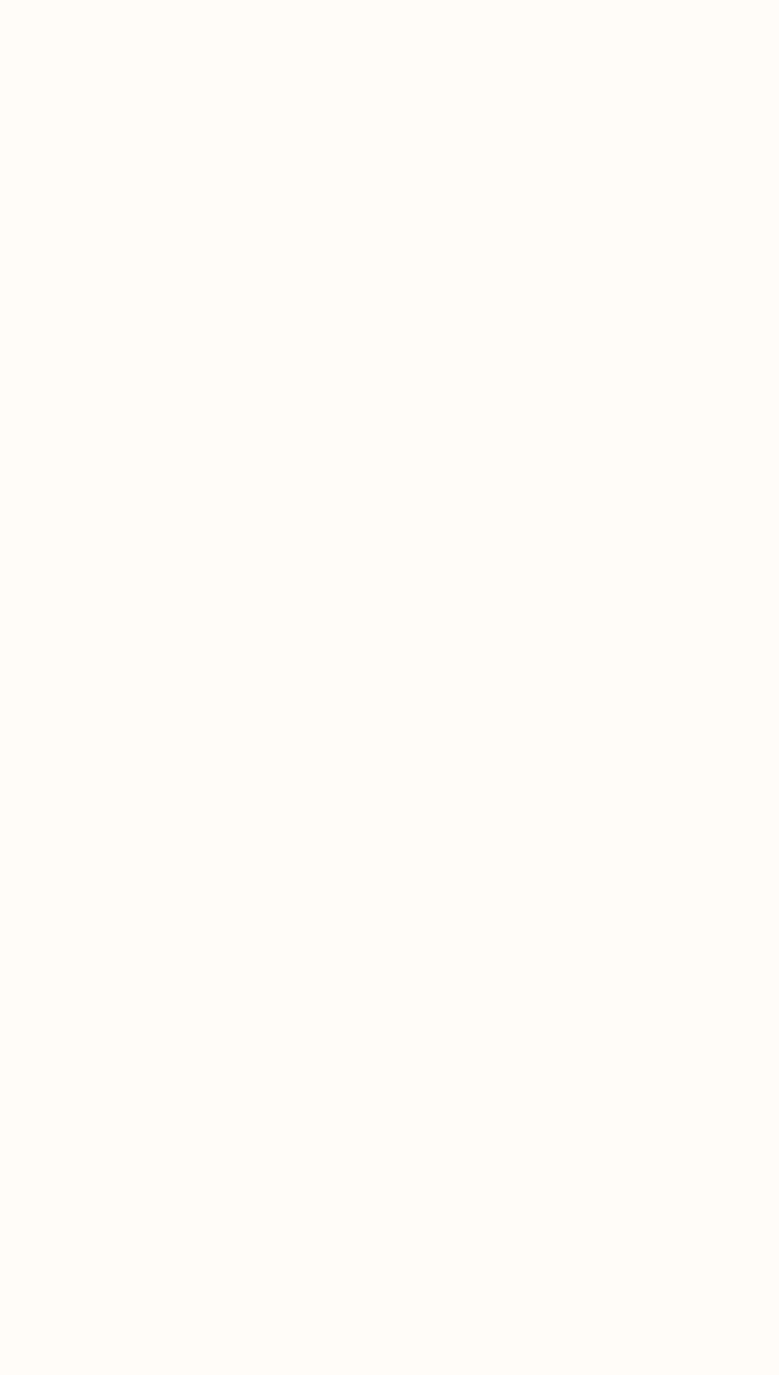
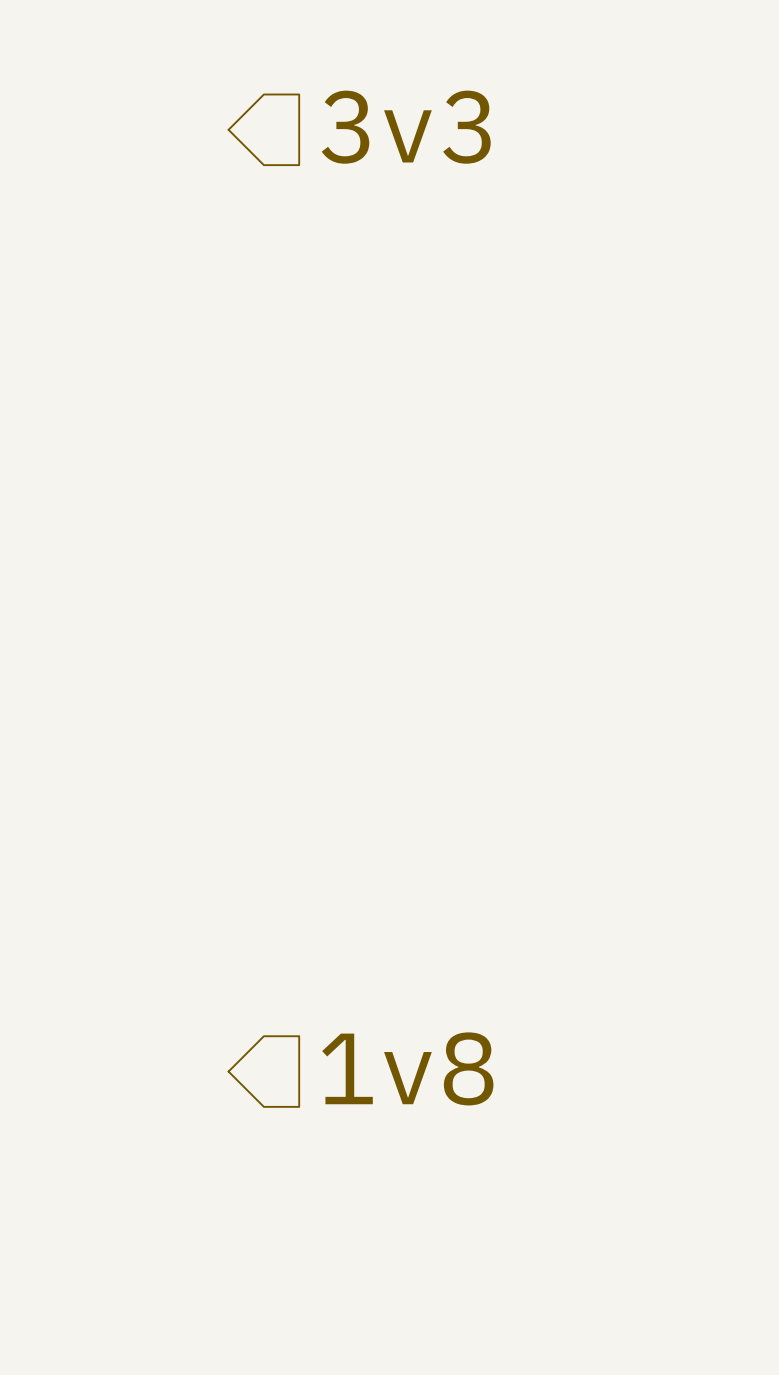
hierarchical label: none -> 3v3 (406, 127)
hierarchical label: none -> 1v8 (407, 1068)

